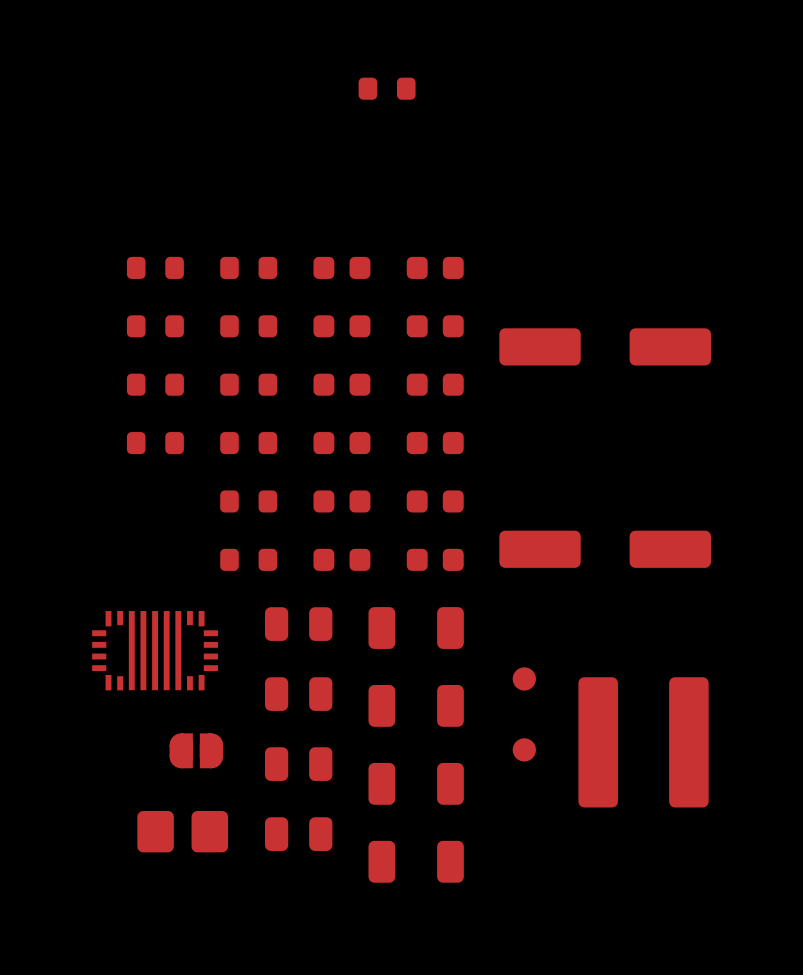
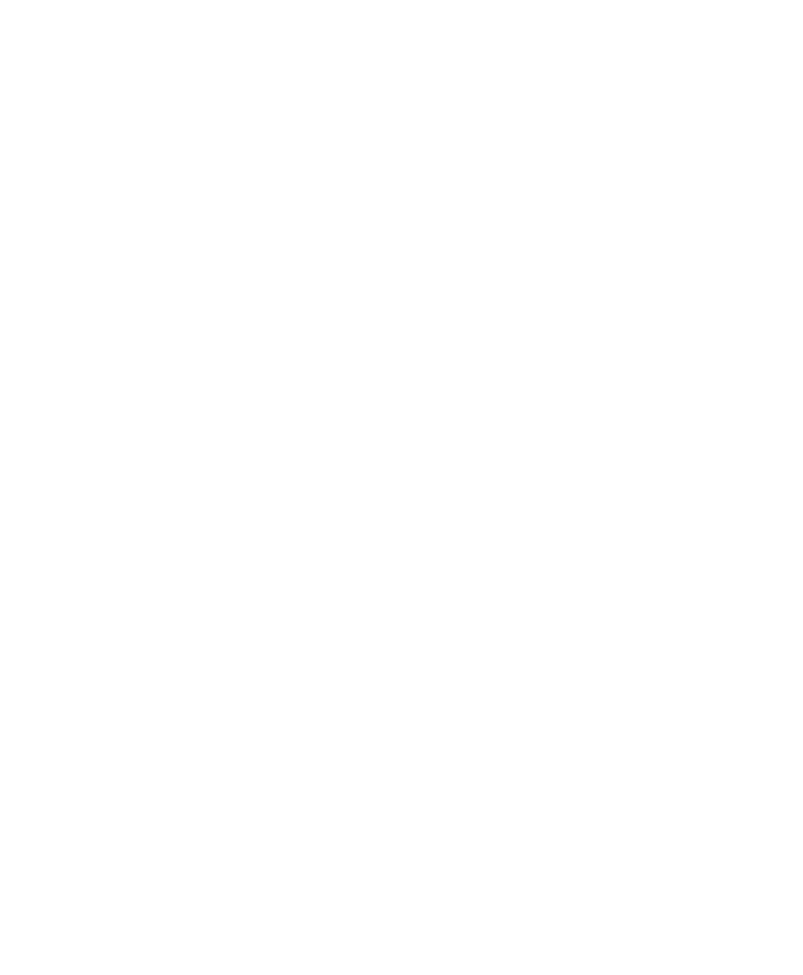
part: (387, 88) -> none
part: (155, 267) -> none
part: (248, 267) -> none
part: (341, 267) -> none
part: (435, 267) -> none
part: (155, 326) -> none
part: (248, 326) -> none
part: (341, 326) -> none
part: (435, 326) -> none
part: (605, 346) -> none
part: (155, 384) -> none
part: (248, 384) -> none
part: (341, 384) -> none
part: (435, 384) -> none
part: (155, 443) -> none
part: (248, 443) -> none
part: (341, 443) -> none
part: (435, 443) -> none
part: (248, 501) -> none
part: (341, 501) -> none
part: (435, 501) -> none
part: (605, 549) -> none
part: (248, 559) -> none
part: (341, 559) -> none
part: (435, 559) -> none
part: (298, 624) -> none
part: (416, 628) -> none
part: (155, 650) -> none
part: (524, 678) -> none
part: (298, 694) -> none
part: (416, 705) -> none
part: (643, 742) -> none
part: (524, 749) -> none
part: (196, 750) -> none
part: (298, 764) -> none
part: (416, 783) -> none
part: (182, 831) -> none
part: (298, 834) -> none
part: (416, 861) -> none

